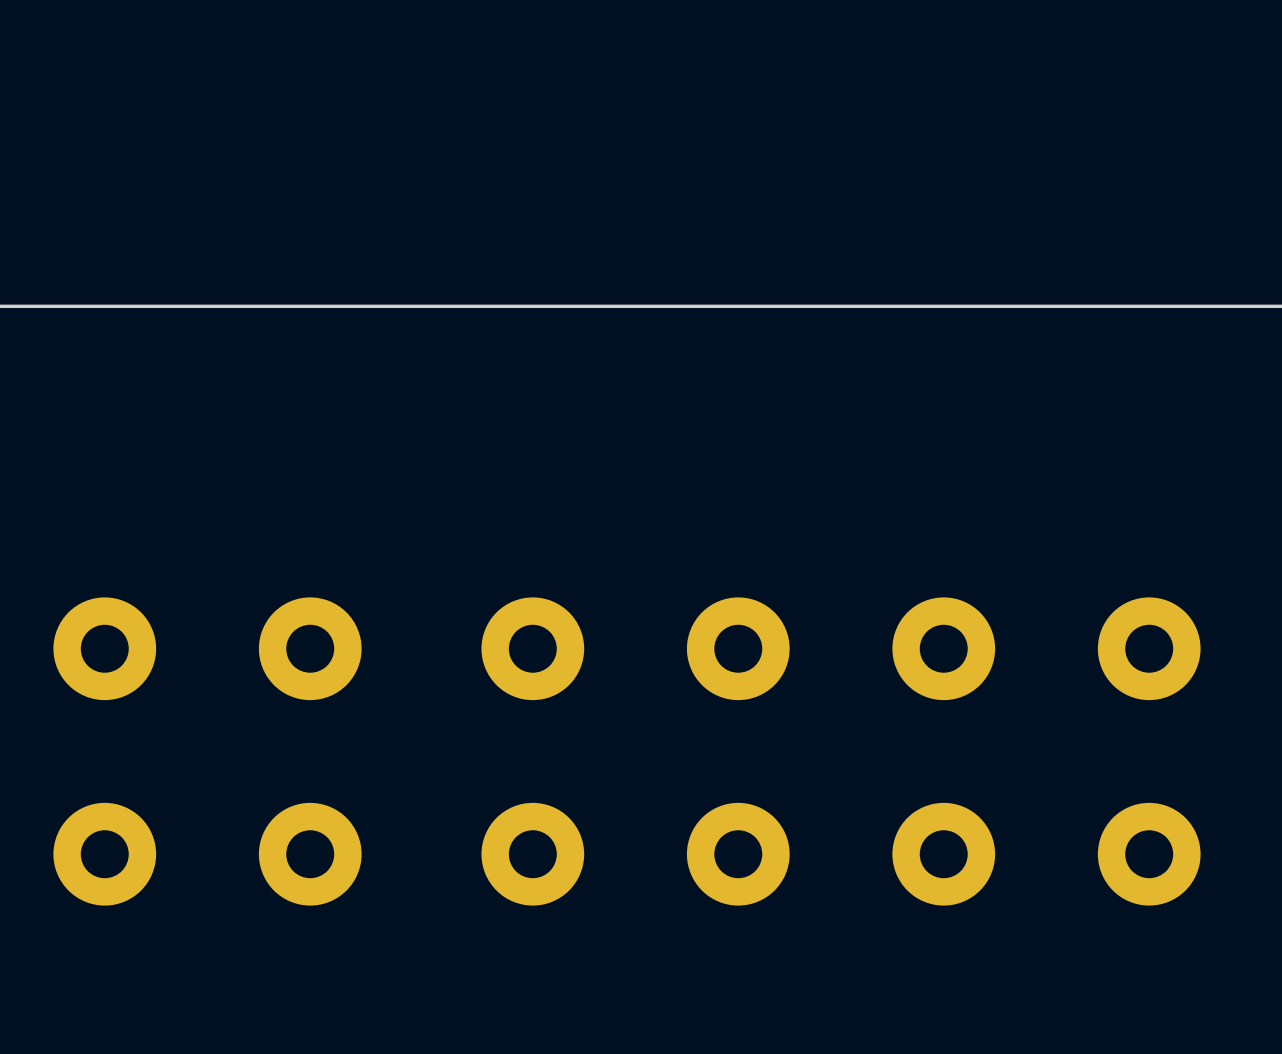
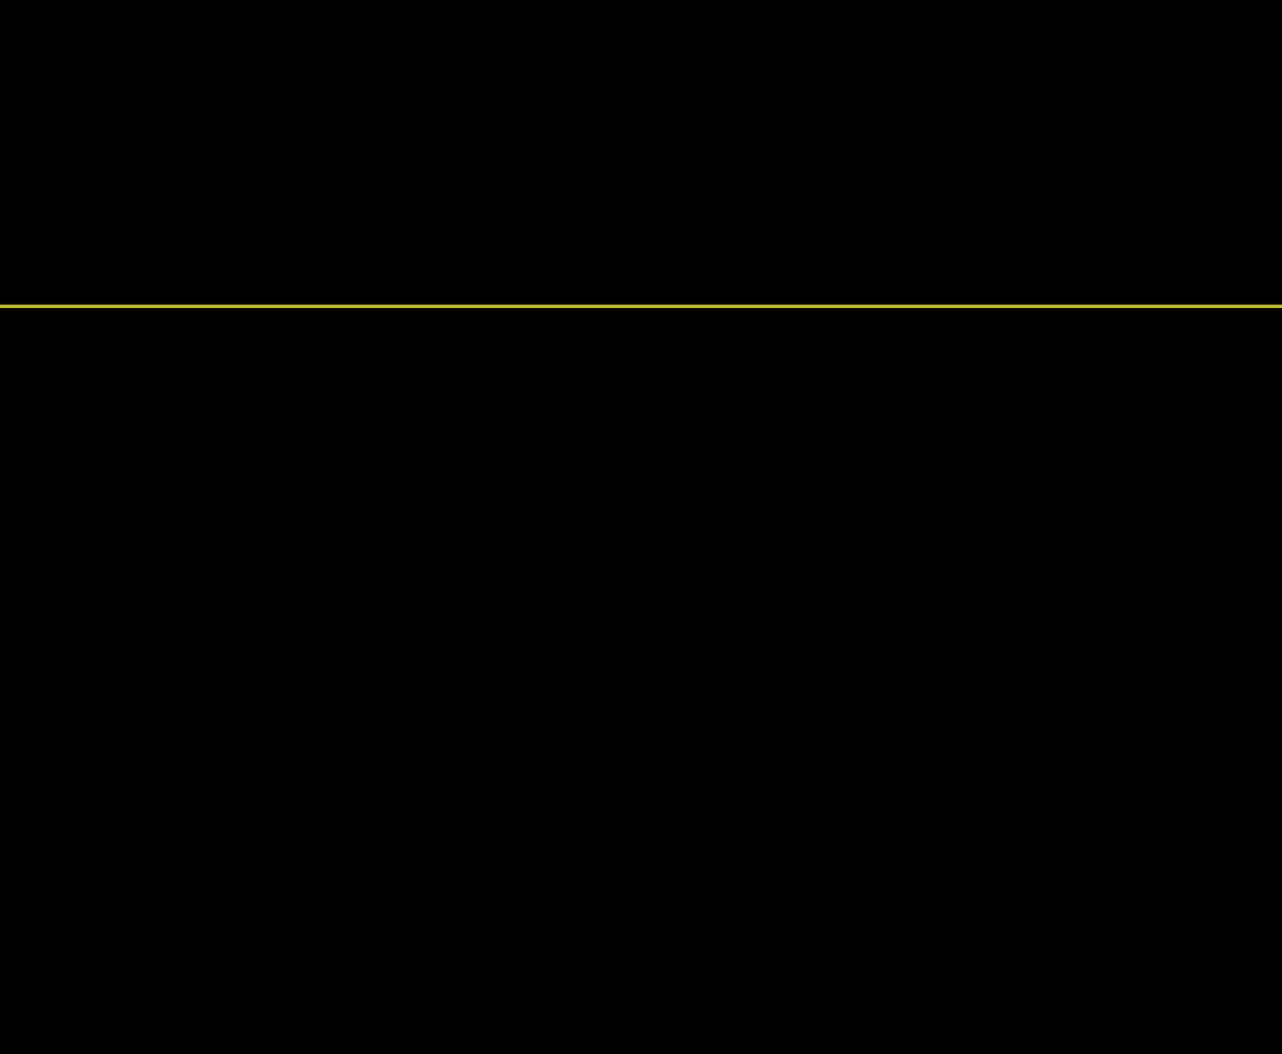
part: (104, 648) -> none
part: (310, 648) -> none
part: (532, 648) -> none
part: (738, 648) -> none
part: (943, 648) -> none
part: (1149, 648) -> none
part: (104, 854) -> none
part: (310, 854) -> none
part: (532, 854) -> none
part: (738, 854) -> none
part: (943, 854) -> none
part: (1149, 854) -> none

